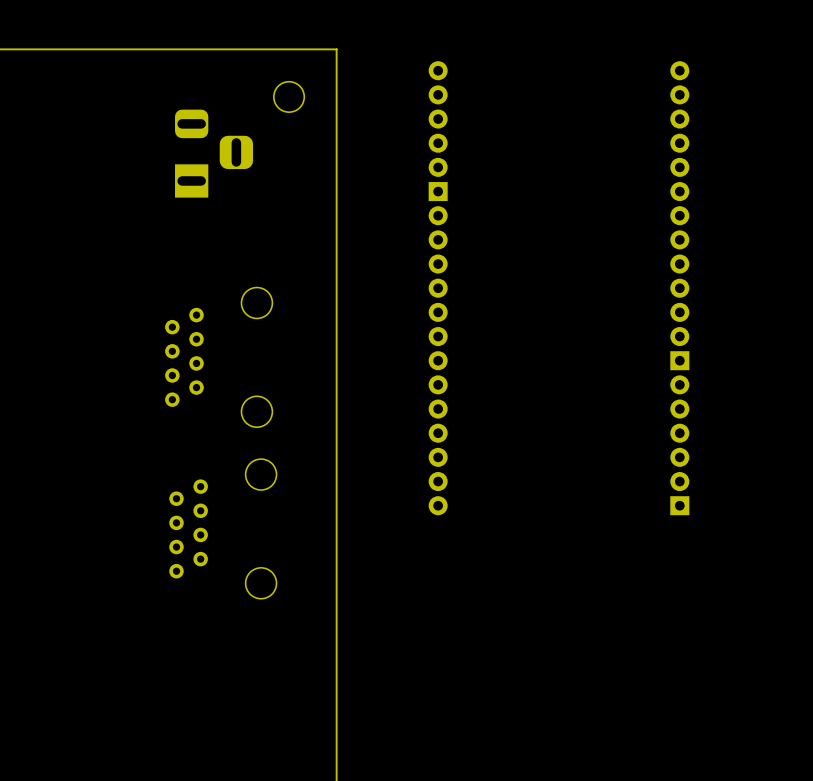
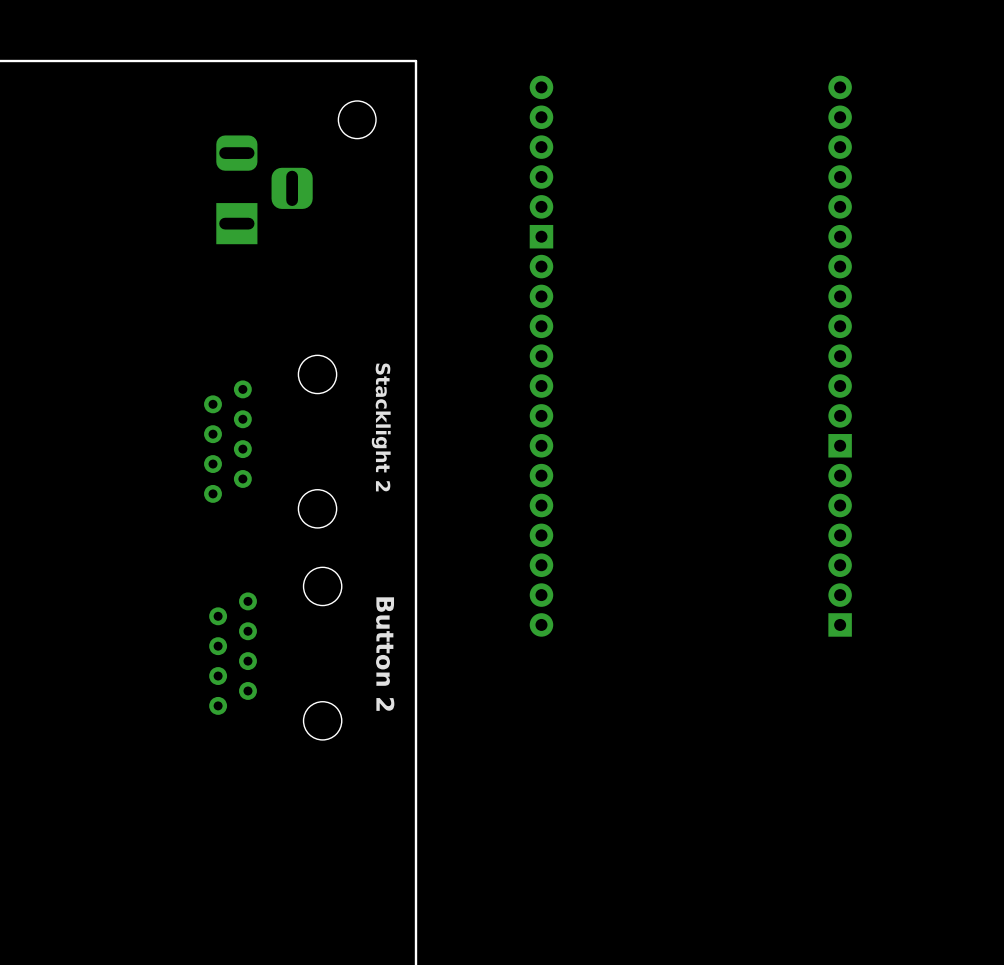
text: none -> Stacklight 2 (381, 427)
text: none -> Button 2 (385, 654)

